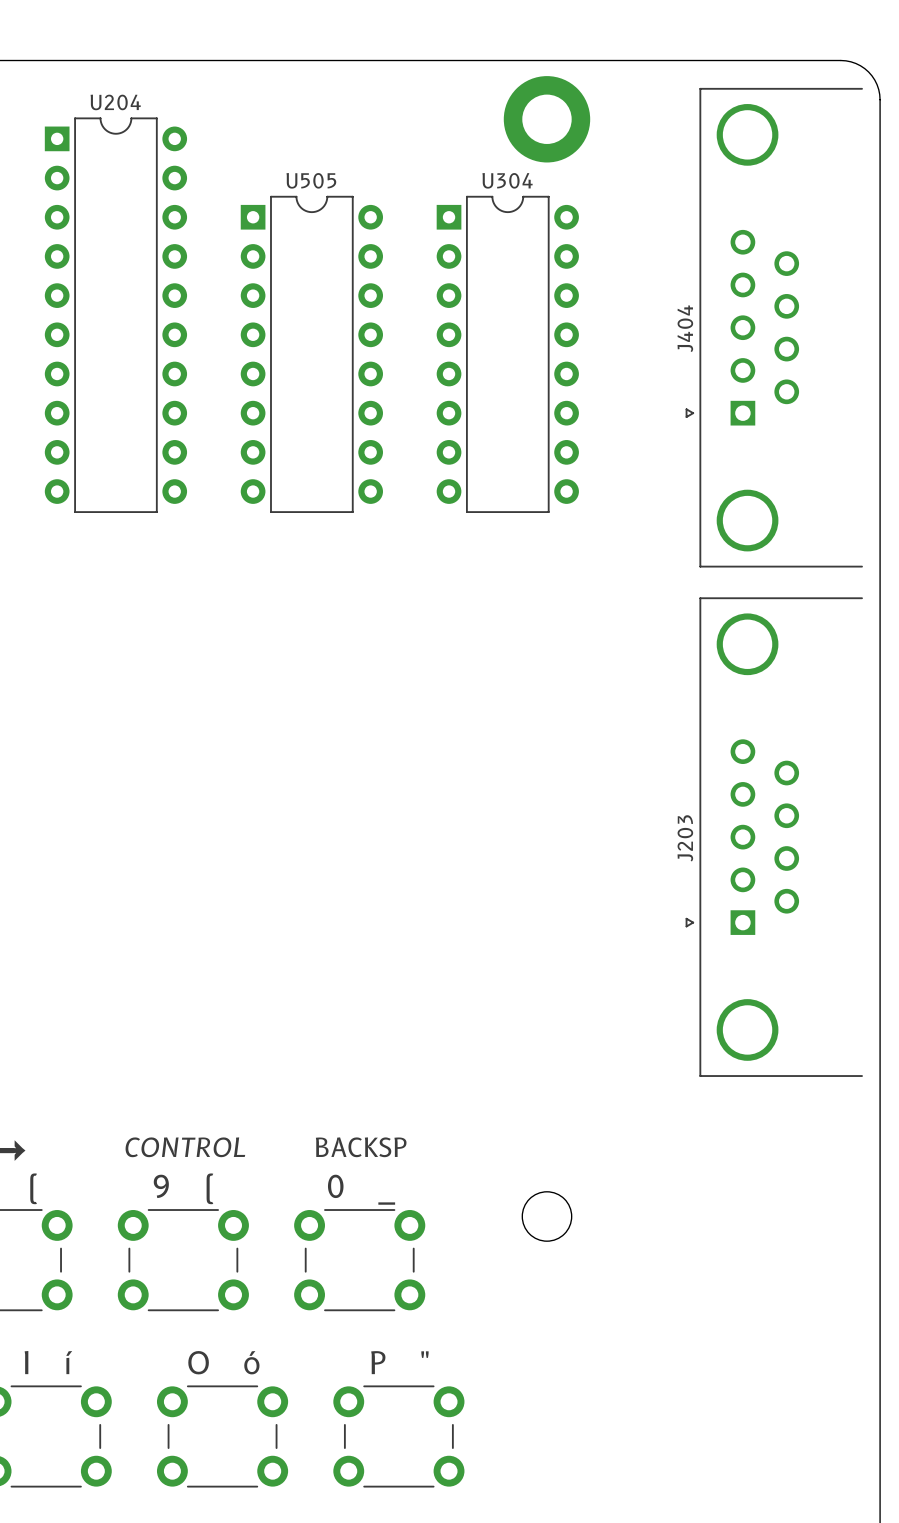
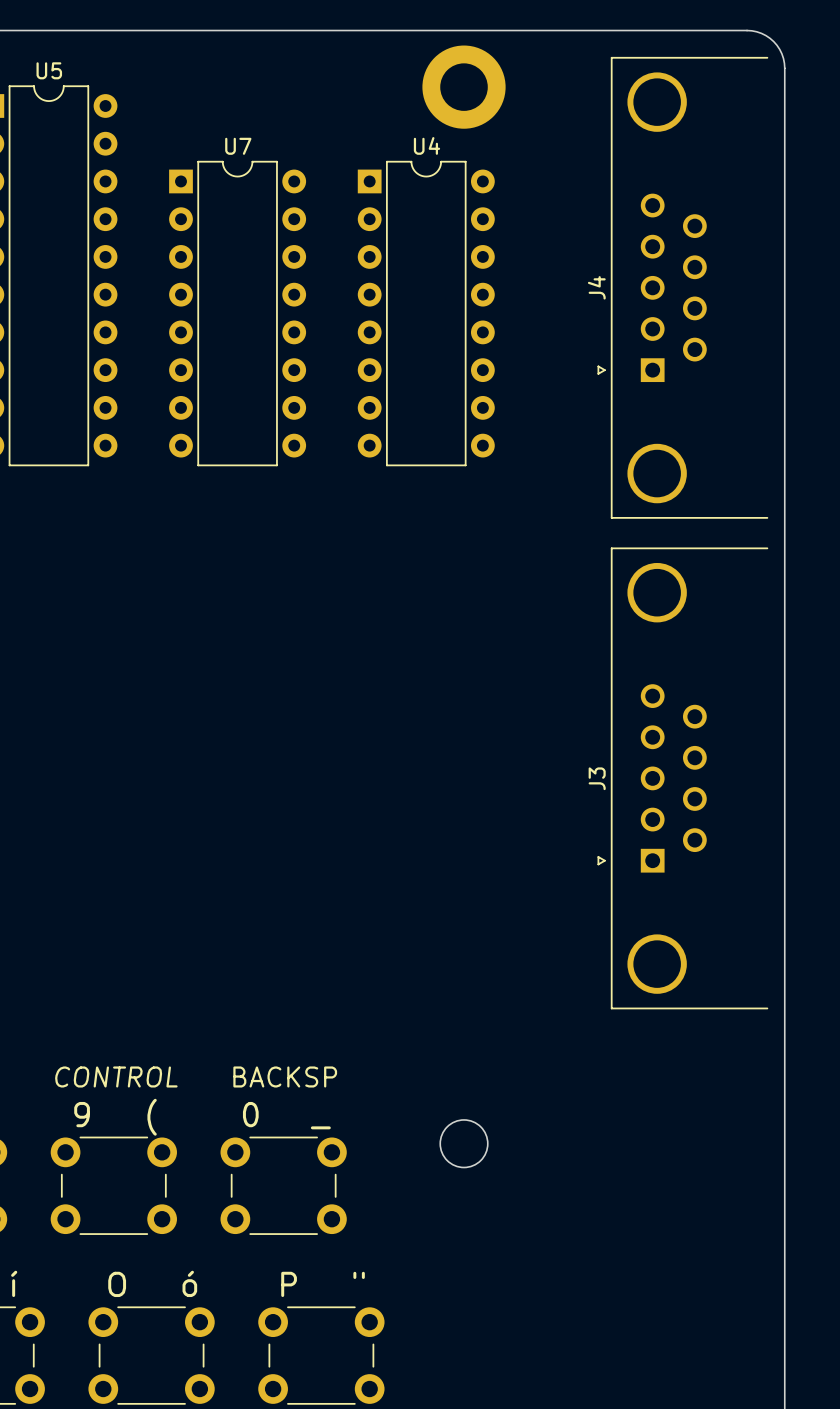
U204 name: U204 (115, 102) -> U5 (49, 70)
U505 name: U505 (311, 180) -> U7 (238, 146)
U304 name: U304 (507, 180) -> U4 (426, 145)
J404 name: J404 (685, 328) -> J4 (596, 287)
J203 name: J203 (685, 838) -> J3 (597, 778)

